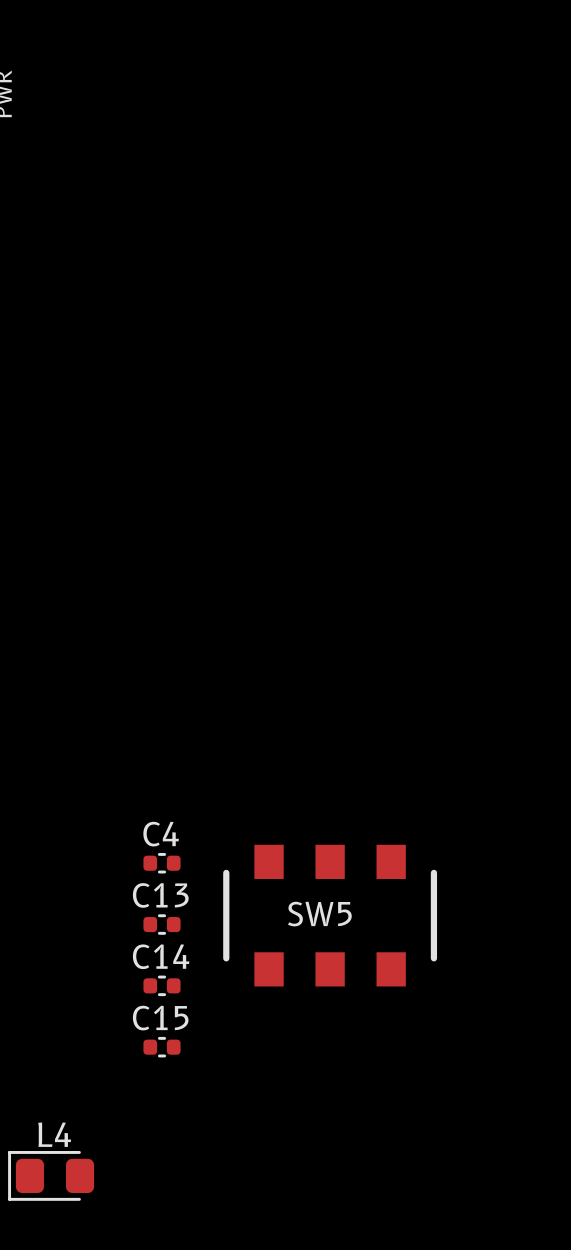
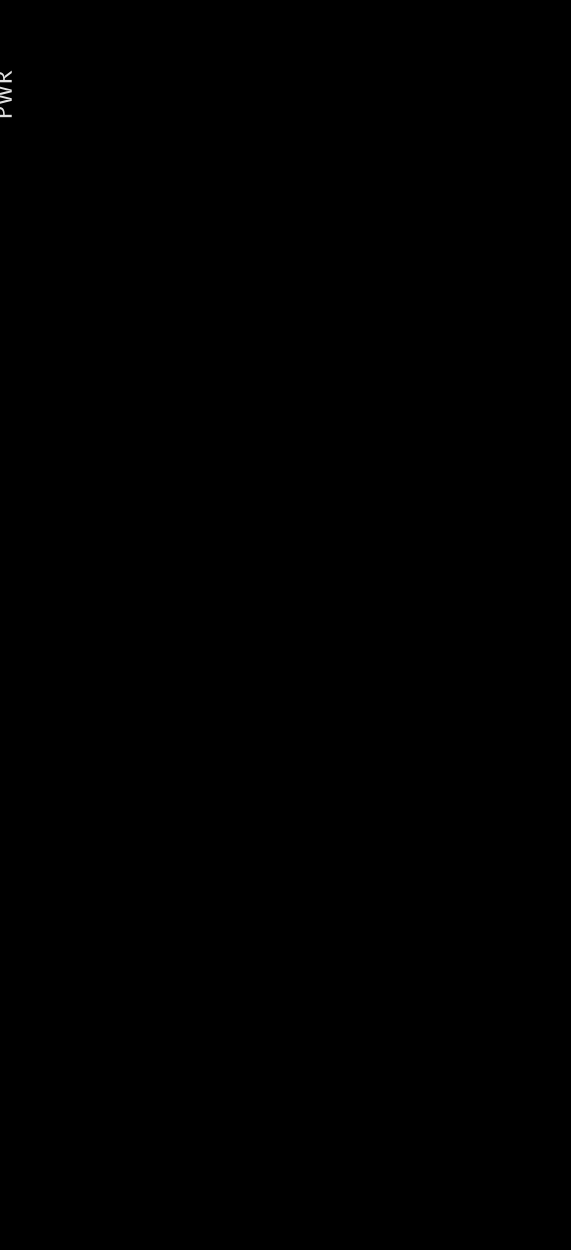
C4: (162, 863) -> none
SW5: (330, 915) -> none
C13: (162, 924) -> none
C14: (162, 985) -> none
C15: (162, 1047) -> none
L4: (51, 1175) -> none

